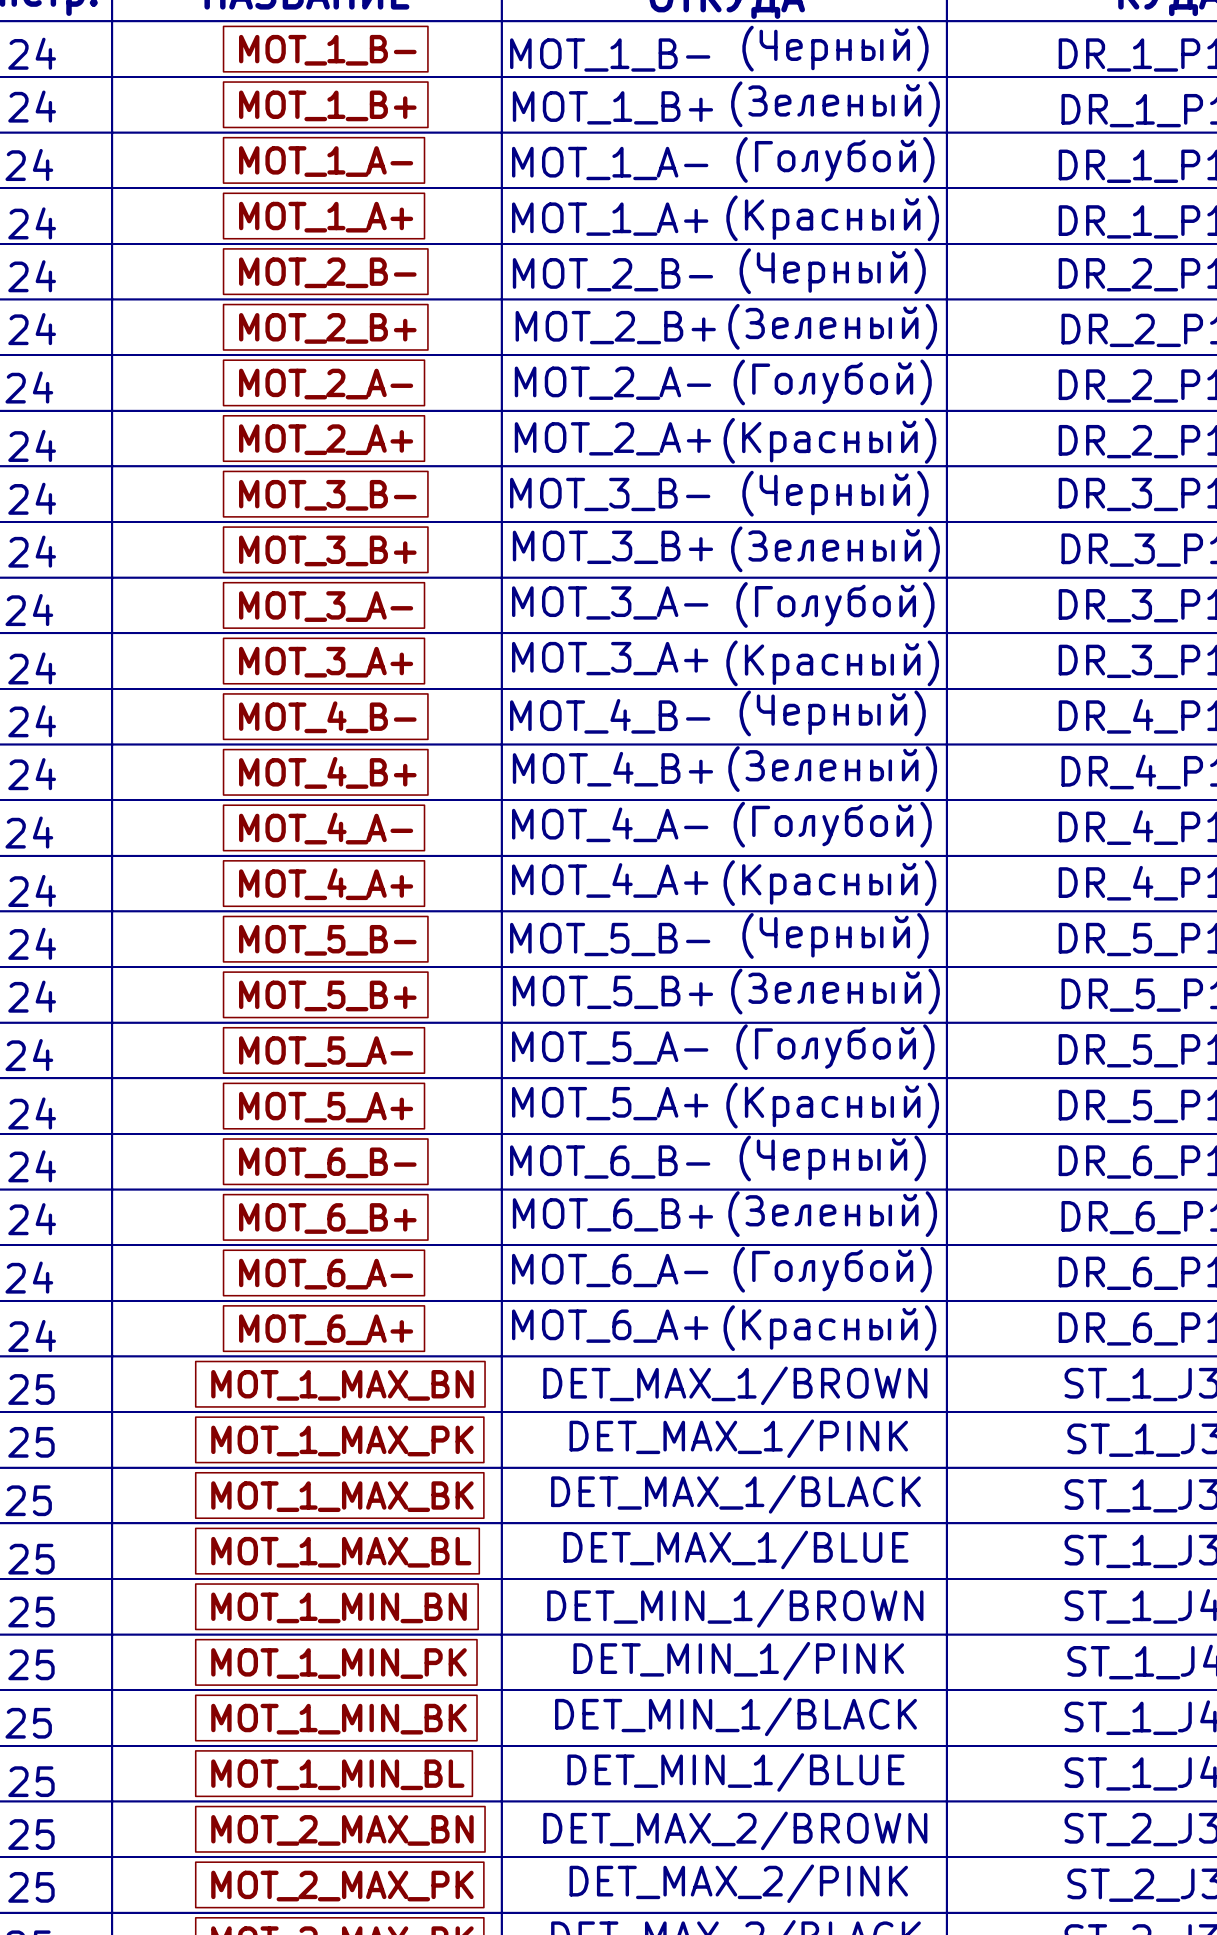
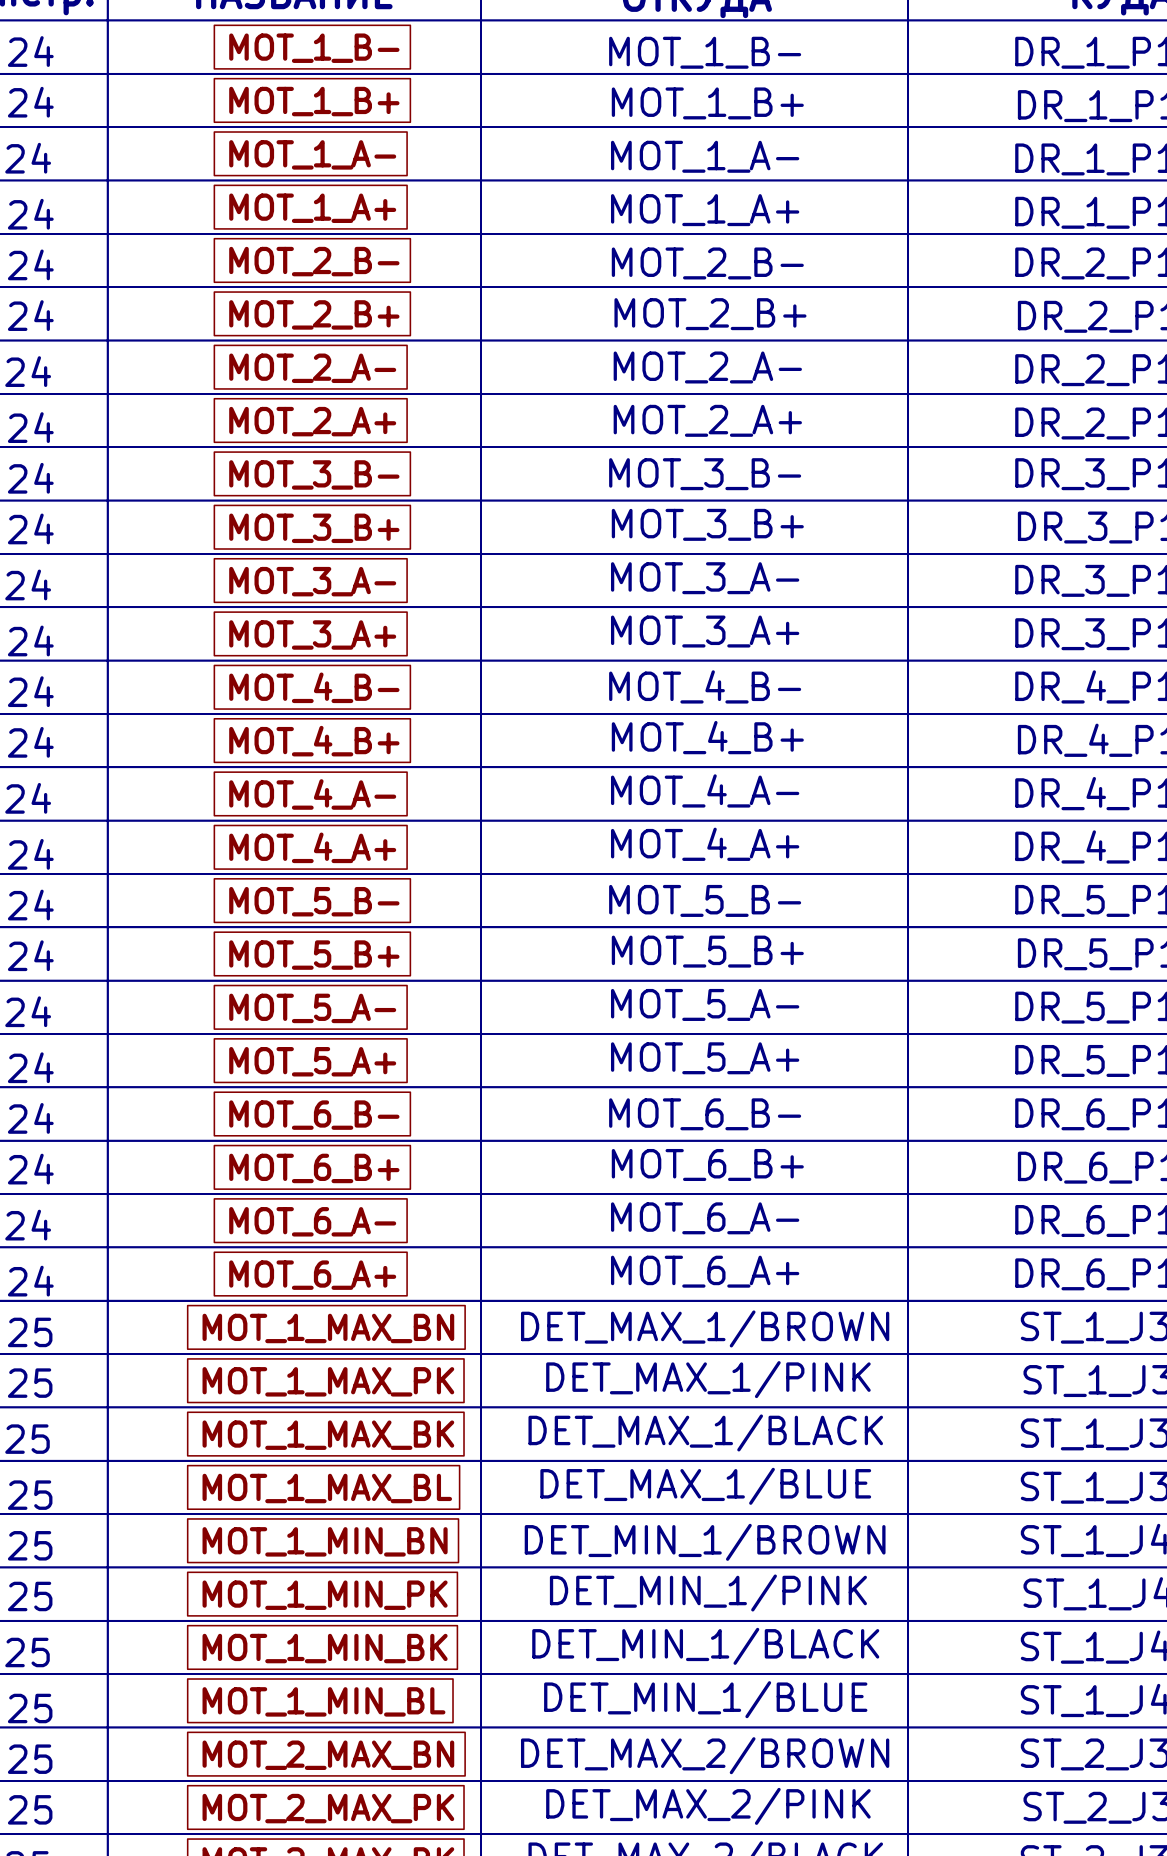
text: (Черный) (835, 48) -> none
text position: MOT_1_B- (610, 55) -> MOT_1_B- (705, 52)
text: (Зеленый) (835, 104) -> none
text position: MOT_1_B+ (612, 107) -> MOT_1_B+ (707, 103)
text: (Голубой) (835, 159) -> none
text position: MOT_1_A- (610, 163) -> MOT_1_A- (705, 156)
text: (Красный) (832, 218) -> none
text position: MOT_1_A+ (610, 219) -> MOT_1_A+ (705, 210)
text: (Черный) (832, 271) -> none
text position: MOT_2_B- (612, 274) -> MOT_2_B- (707, 263)
text: (Зеленый) (832, 326) -> none
text position: MOT_2_B+ (615, 327) -> MOT_2_B+ (710, 314)
text: (Голубой) (832, 382) -> none
text position: MOT_2_A- (612, 383) -> MOT_2_A- (707, 367)
text position: MOT_2_A+ (612, 438) -> MOT_2_A+ (707, 420)
text: (Красный) (829, 440) -> none
text: (Черный) (835, 493) -> none
text position: MOT_3_B- (610, 494) -> MOT_3_B- (705, 474)
text position: MOT_3_B+ (612, 547) -> MOT_3_B+ (707, 524)
text: (Зеленый) (835, 549) -> none
text position: MOT_3_A- (610, 602) -> MOT_3_A- (705, 578)
text: (Голубой) (835, 604) -> none
text position: MOT_3_A+ (610, 658) -> MOT_3_A+ (705, 631)
text: (Красный) (832, 663) -> none
text: (Черный) (832, 713) -> none
text position: MOT_4_B- (610, 716) -> MOT_4_B- (705, 686)
text position: MOT_4_B+ (612, 769) -> MOT_4_B+ (707, 737)
text: (Зеленый) (832, 769) -> none
text position: MOT_4_A- (610, 824) -> MOT_4_A- (705, 790)
text: (Голубой) (832, 824) -> none
text position: MOT_4_A+ (610, 880) -> MOT_4_A+ (705, 844)
text: (Красный) (829, 883) -> none
text: (Черный) (835, 935) -> none
text position: MOT_5_B- (610, 939) -> MOT_5_B- (705, 900)
text: (Зеленый) (835, 991) -> none
text position: MOT_5_B+ (612, 992) -> MOT_5_B+ (707, 951)
text position: MOT_5_A- (610, 1047) -> MOT_5_A- (705, 1004)
text: (Голубой) (835, 1047) -> none
text position: MOT_5_A+ (610, 1103) -> MOT_5_A+ (705, 1058)
text: (Красный) (832, 1105) -> none
text: (Черный) (832, 1158) -> none
text position: MOT_6_B- (610, 1162) -> MOT_6_B- (705, 1114)
text position: MOT_6_B+ (612, 1214) -> MOT_6_B+ (707, 1164)
text: (Зеленый) (832, 1214) -> none
text: (Голубой) (832, 1269) -> none
text position: MOT_6_A- (610, 1270) -> MOT_6_A- (705, 1218)
text position: MOT_6_A+ (610, 1326) -> MOT_6_A+ (705, 1271)
text: (Красный) (829, 1328) -> none

